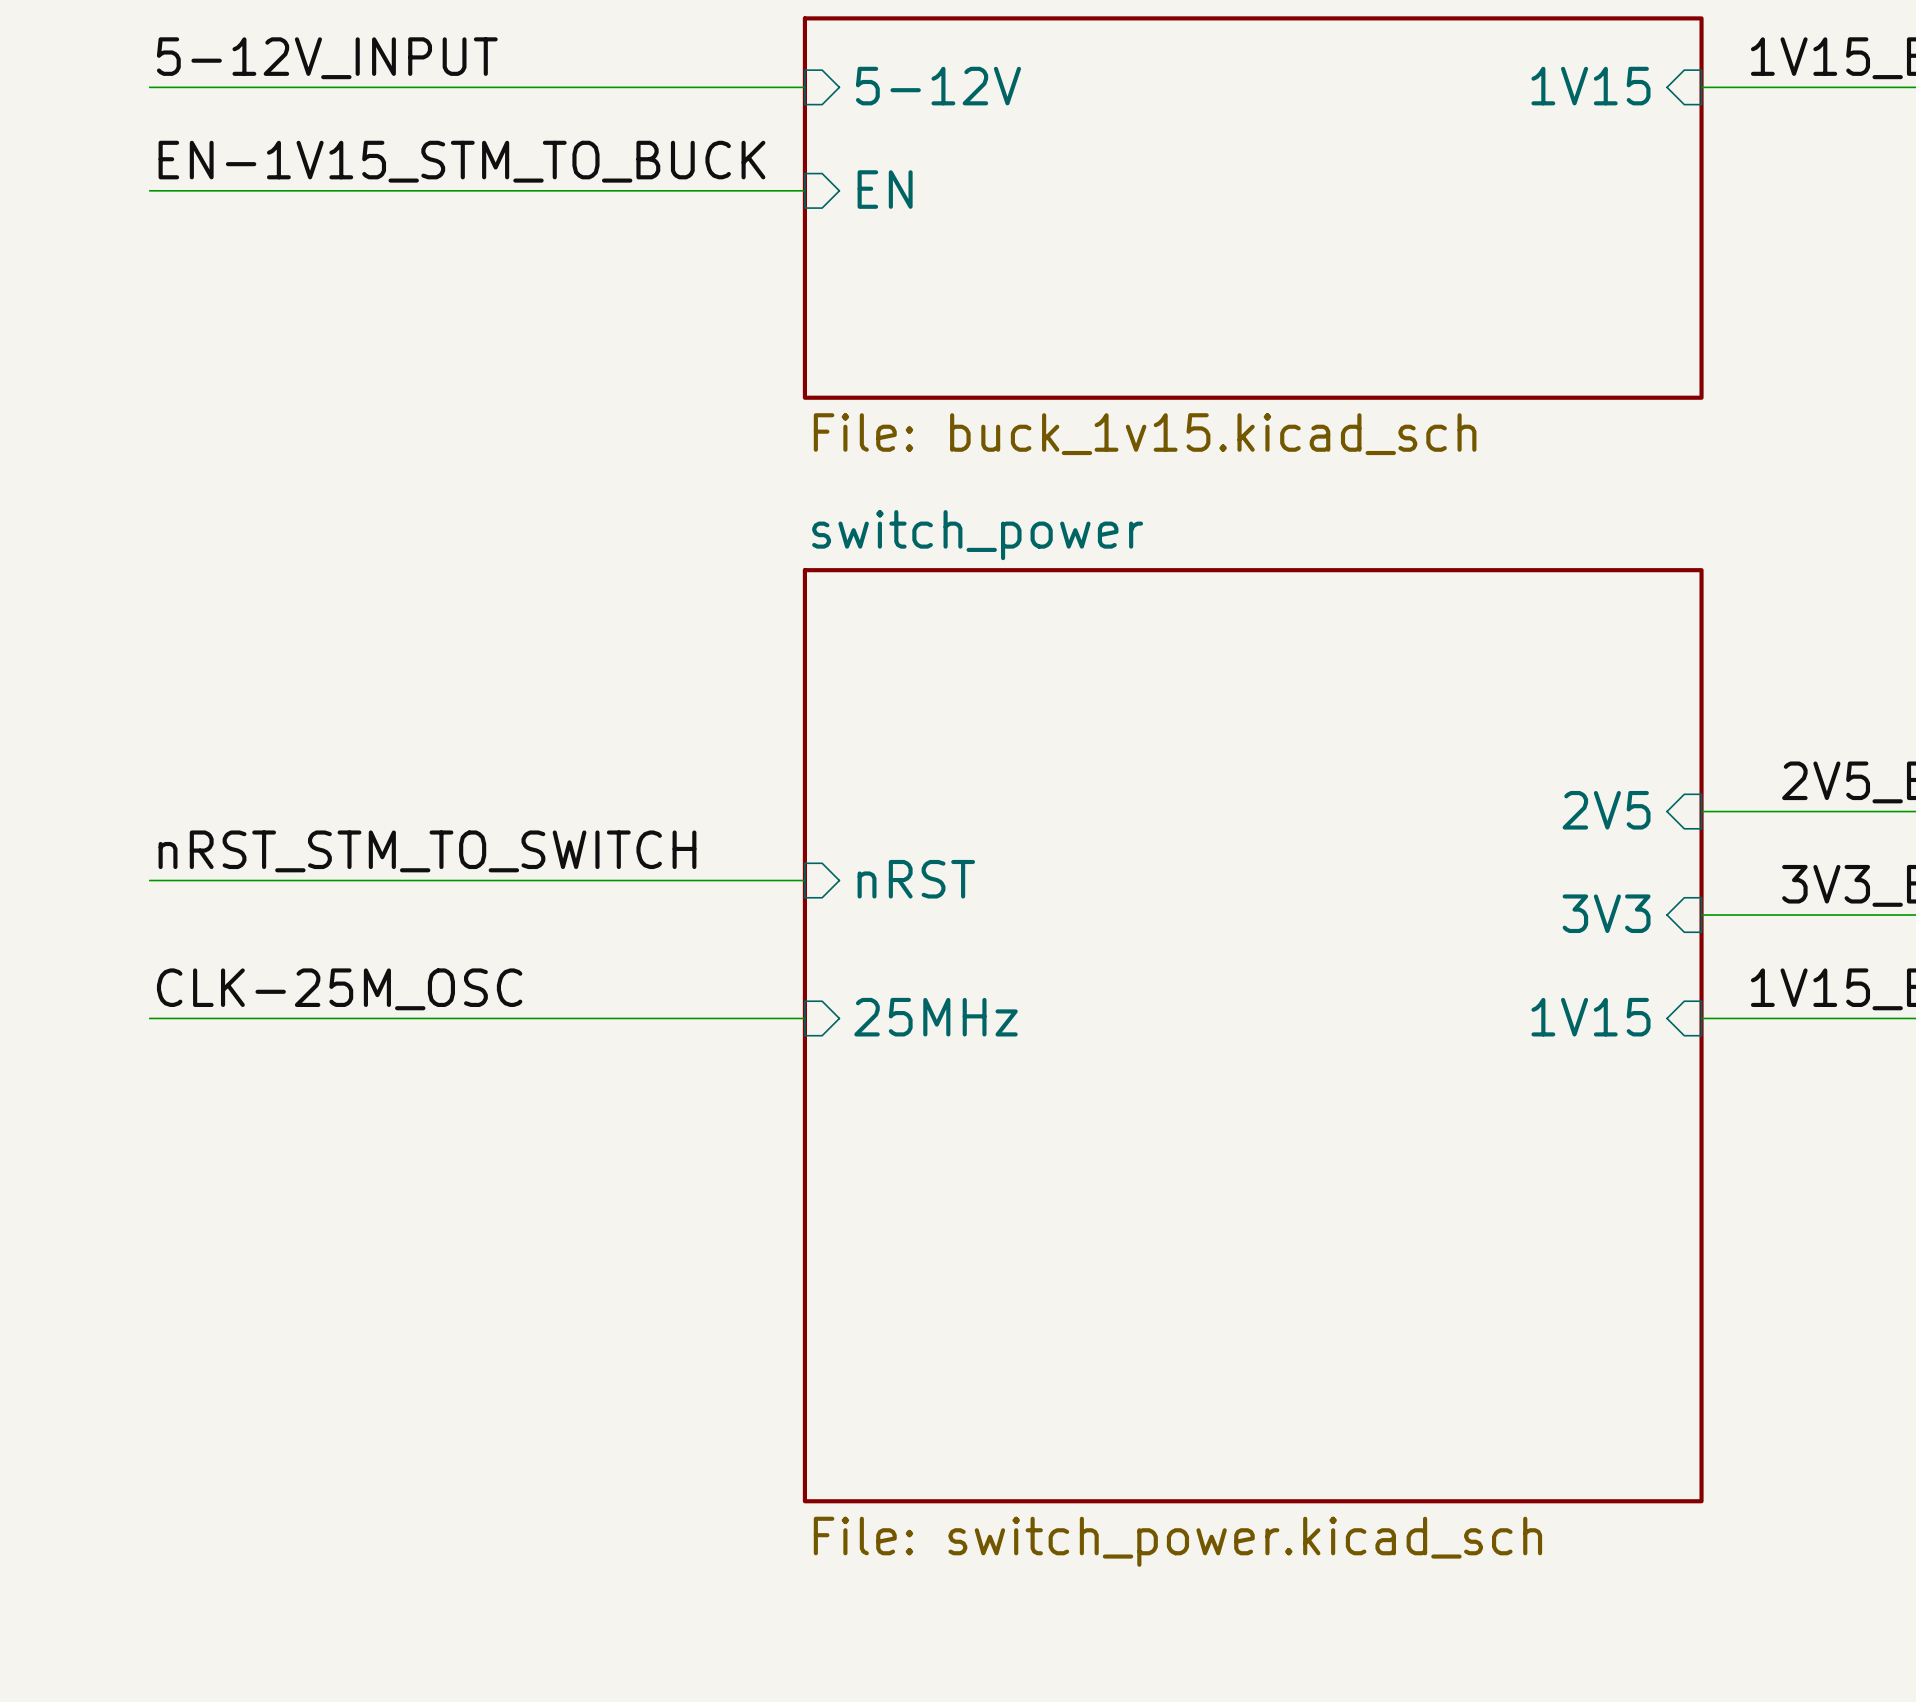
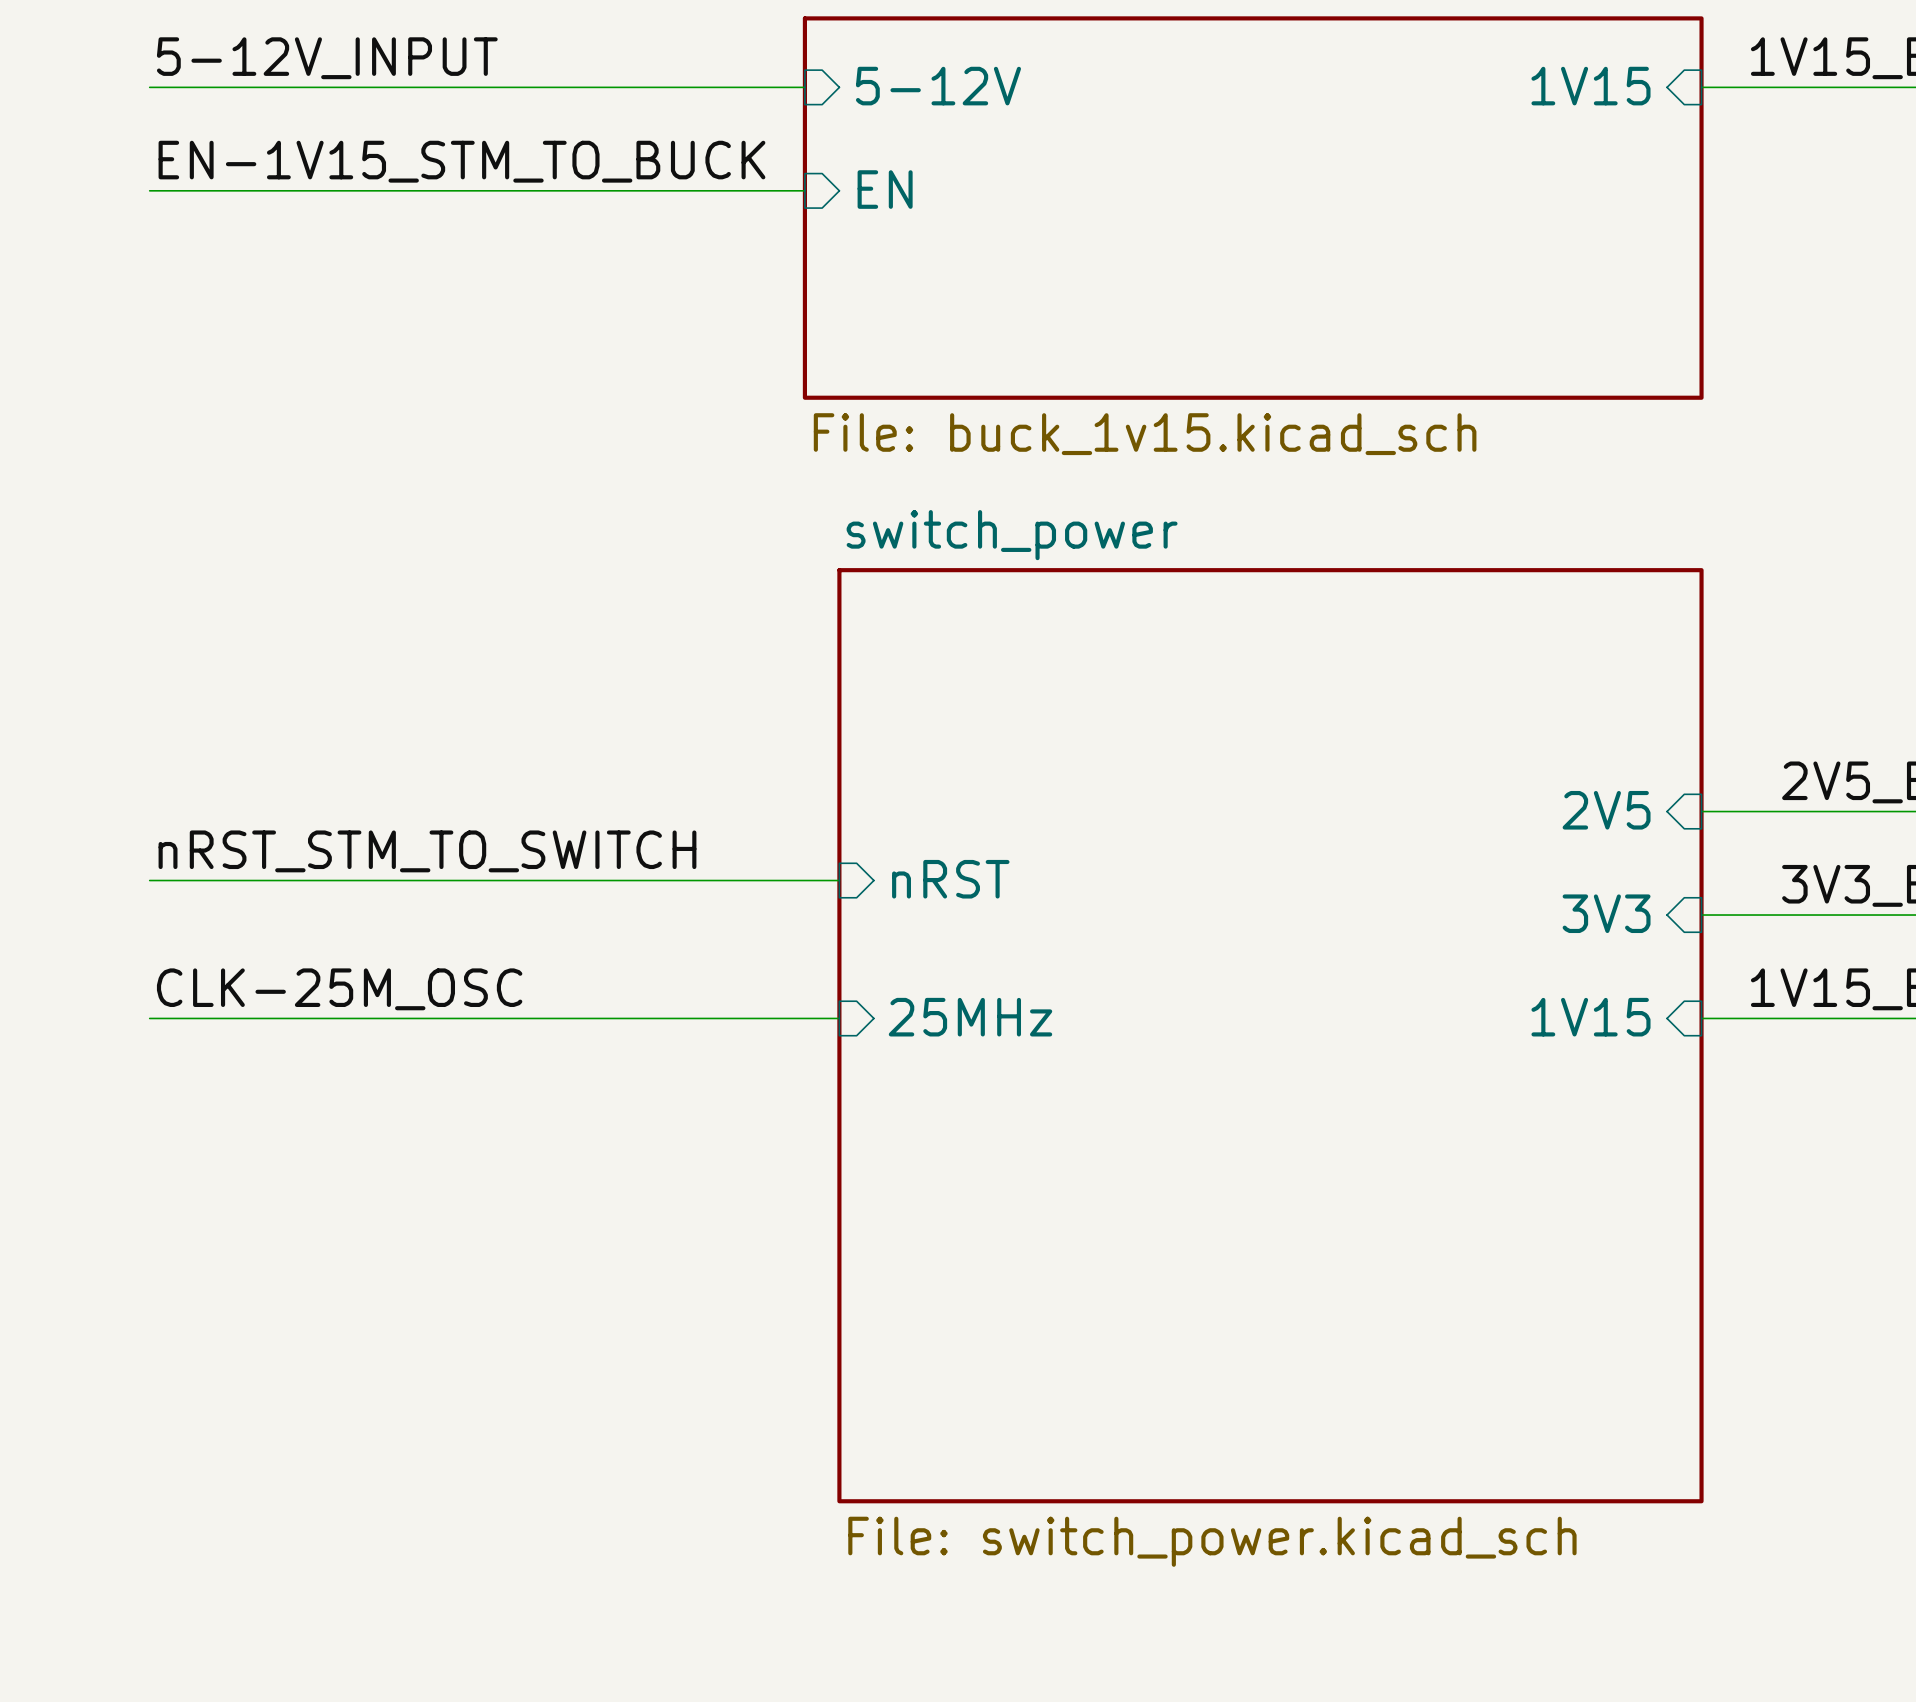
sheet switch_power shape: [802, 568, 1704, 1504] -> [837, 568, 1704, 1504]
sheet pin position: nRST (916, 879) -> nRST (950, 879)
wire: none -> (804, 880) (839, 880)
sheet pin position: 25MHz (936, 1017) -> 25MHz (970, 1017)
wire: none -> (804, 1018) (839, 1018)

